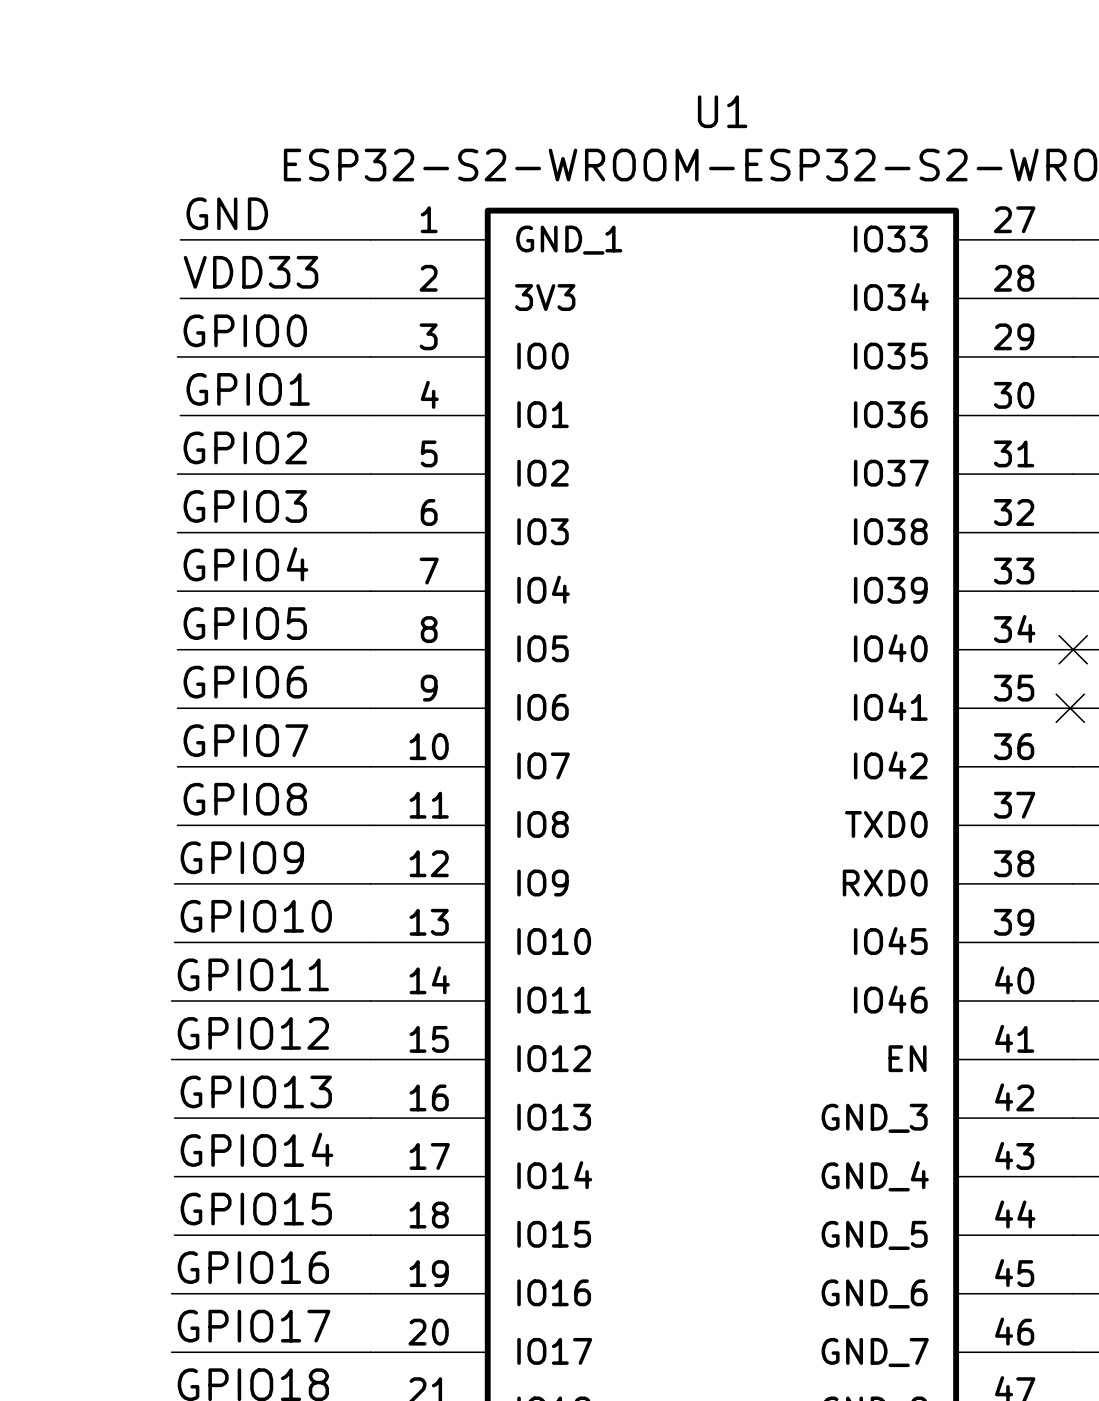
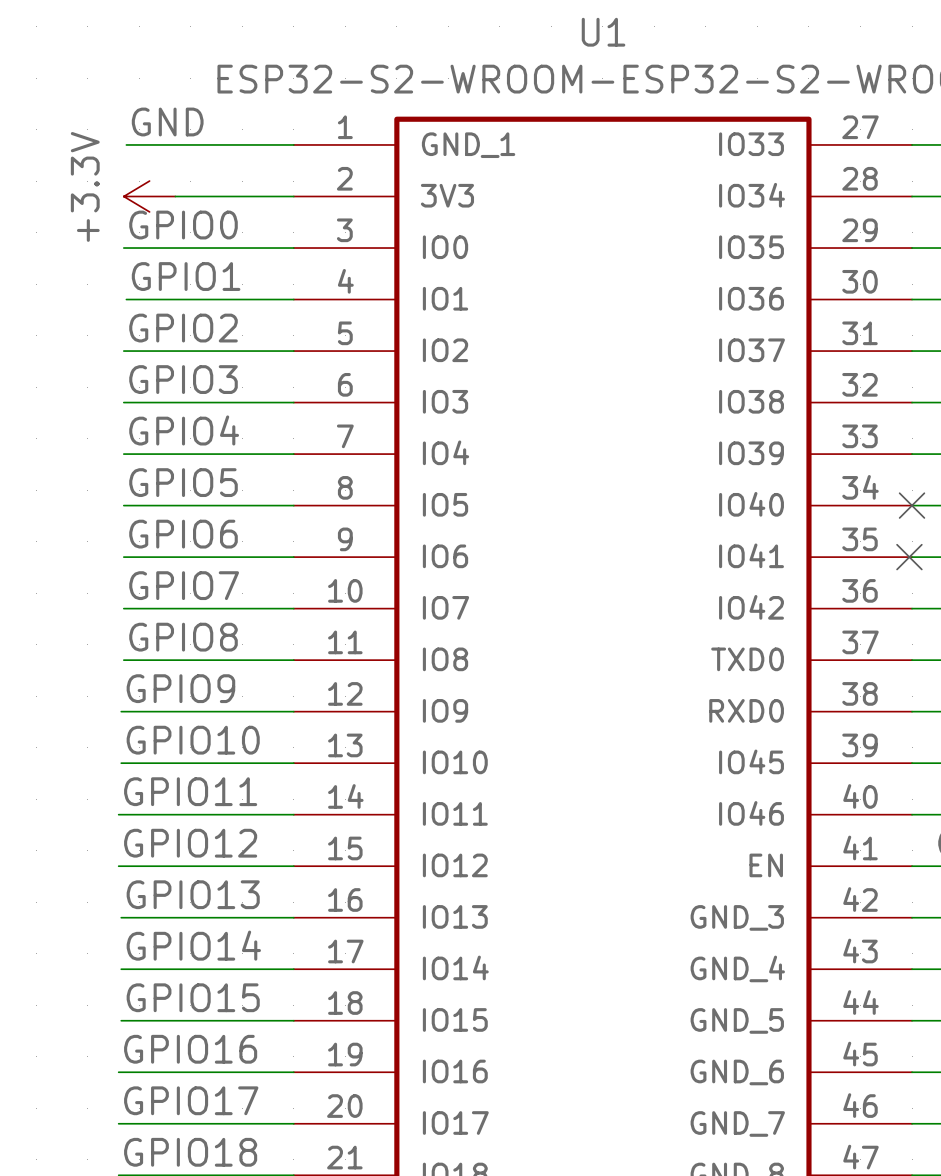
label: VDD33 (250, 272) -> none
power symbol: none -> +3.3V (149, 196)

